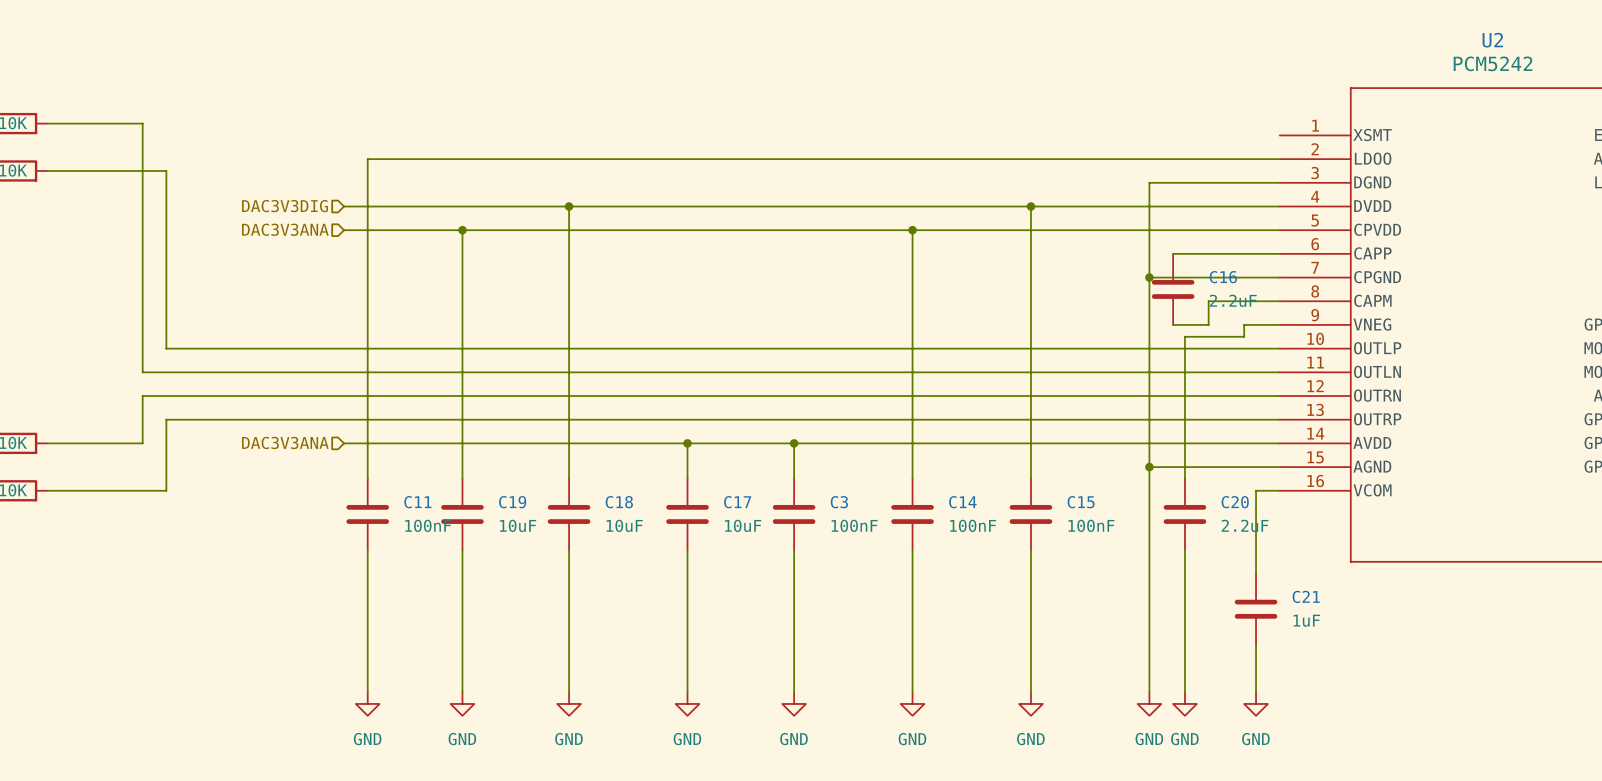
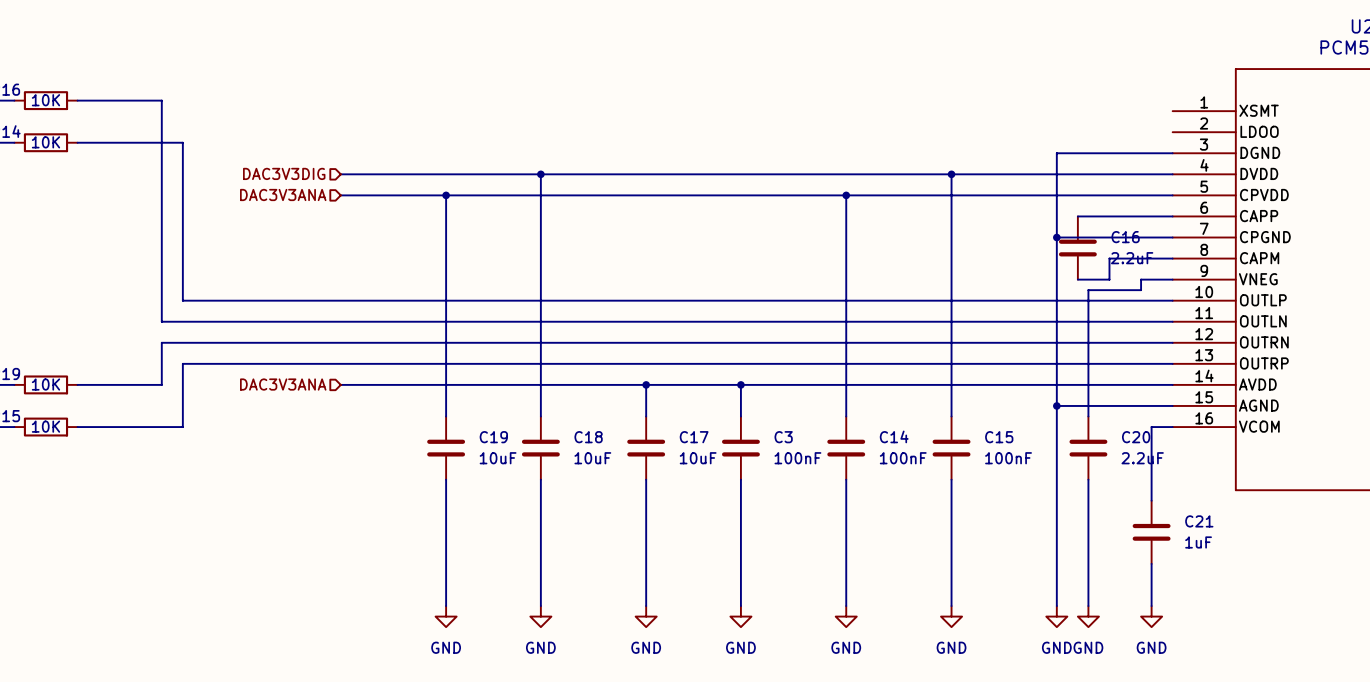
wire: (1279, 159) (367, 159) (367, 478) -> none
C11: 100nF (367, 514) -> none
wire: (367, 549) (367, 692) -> none
power symbol: GND (367, 703) -> none

